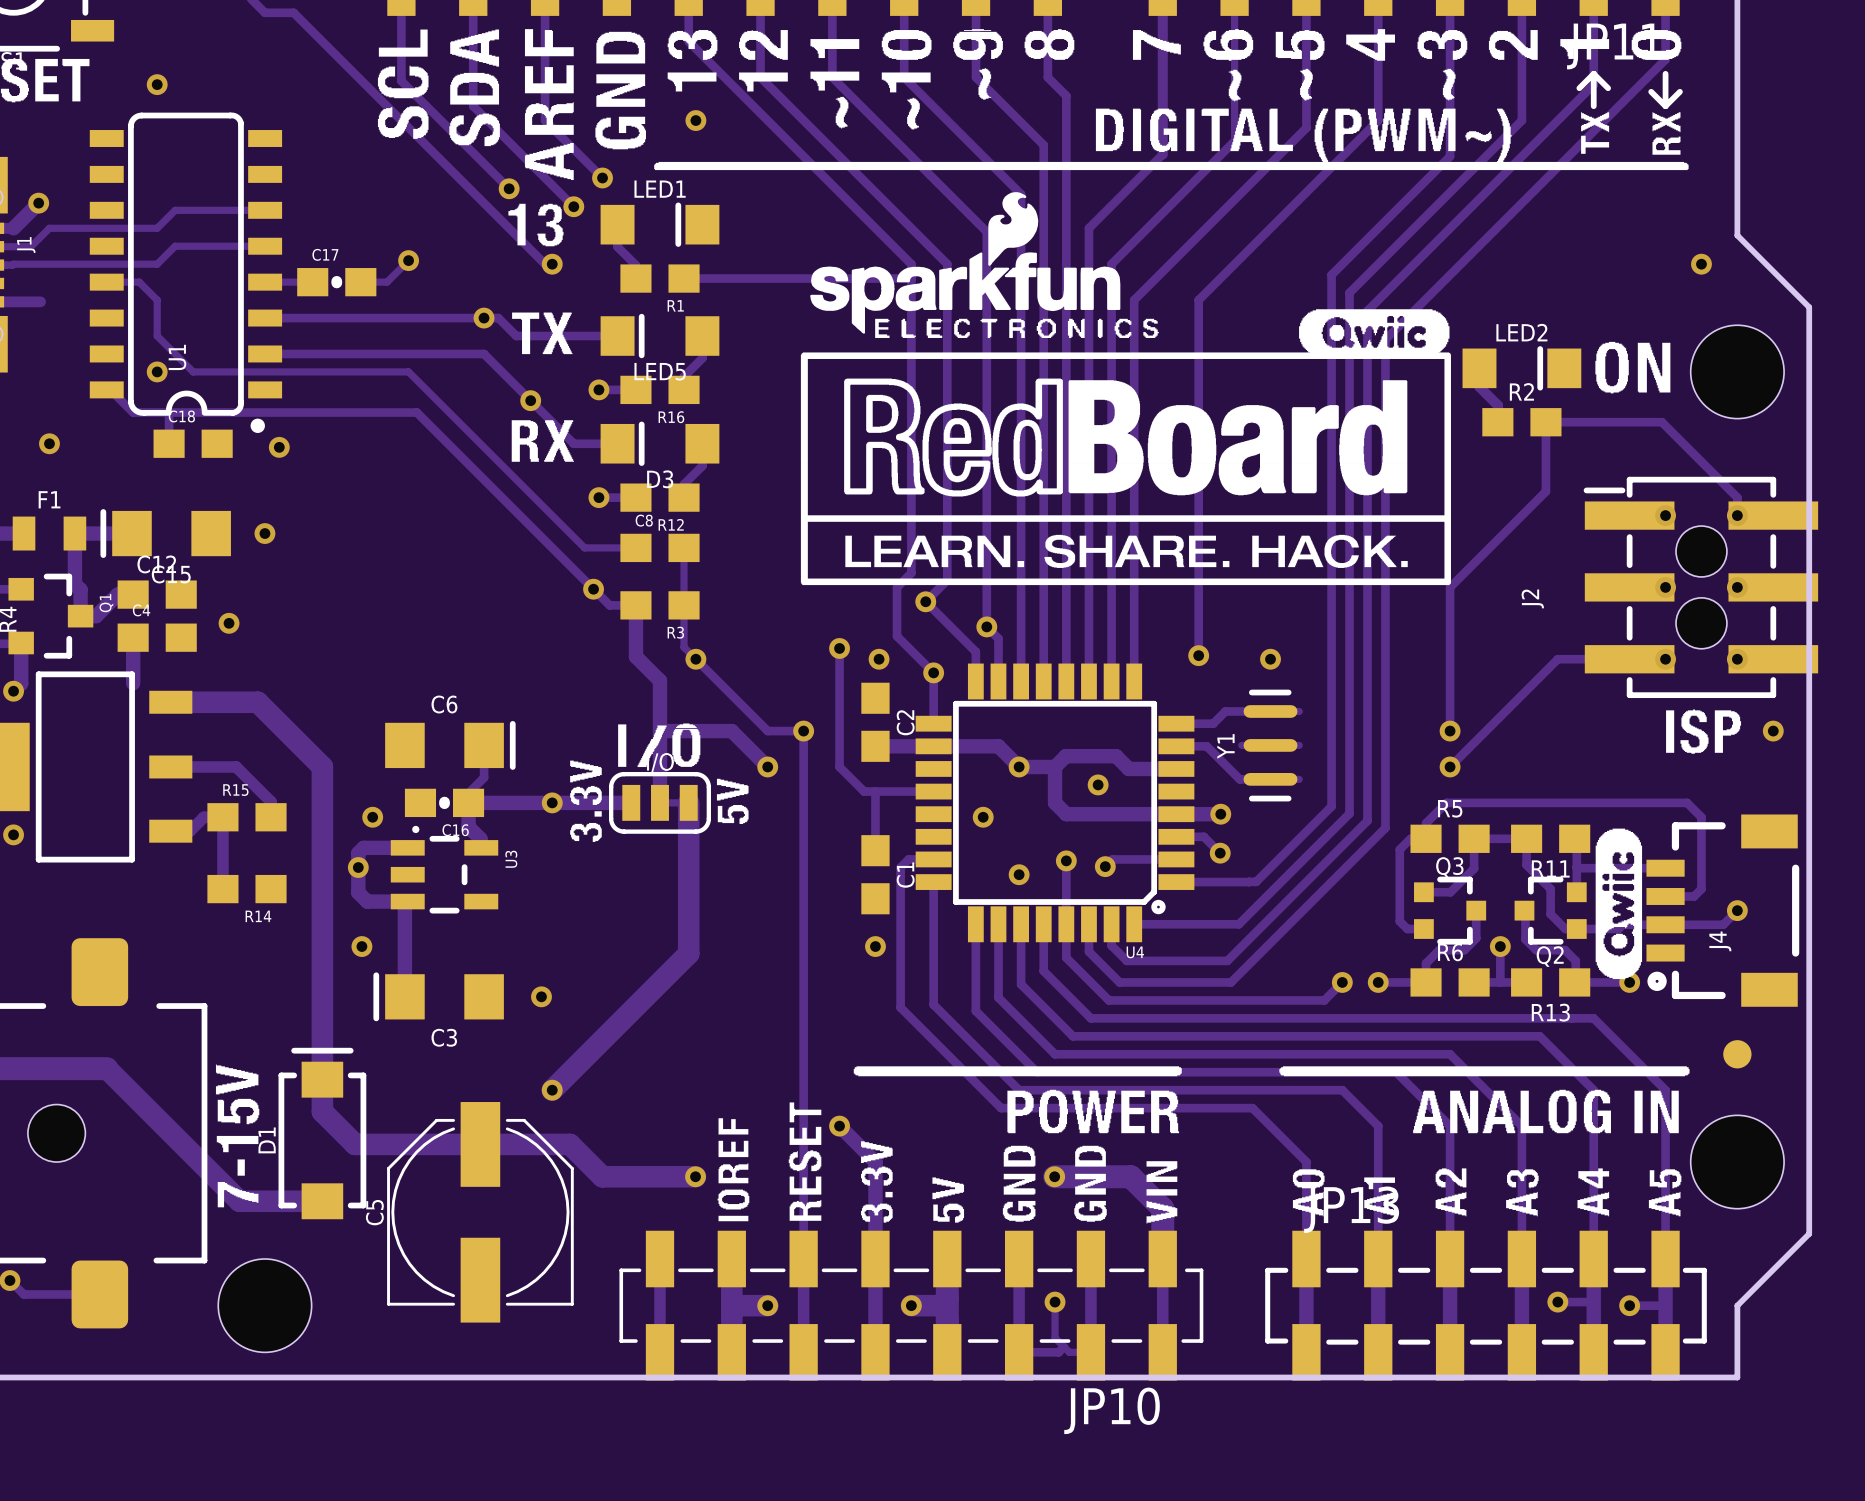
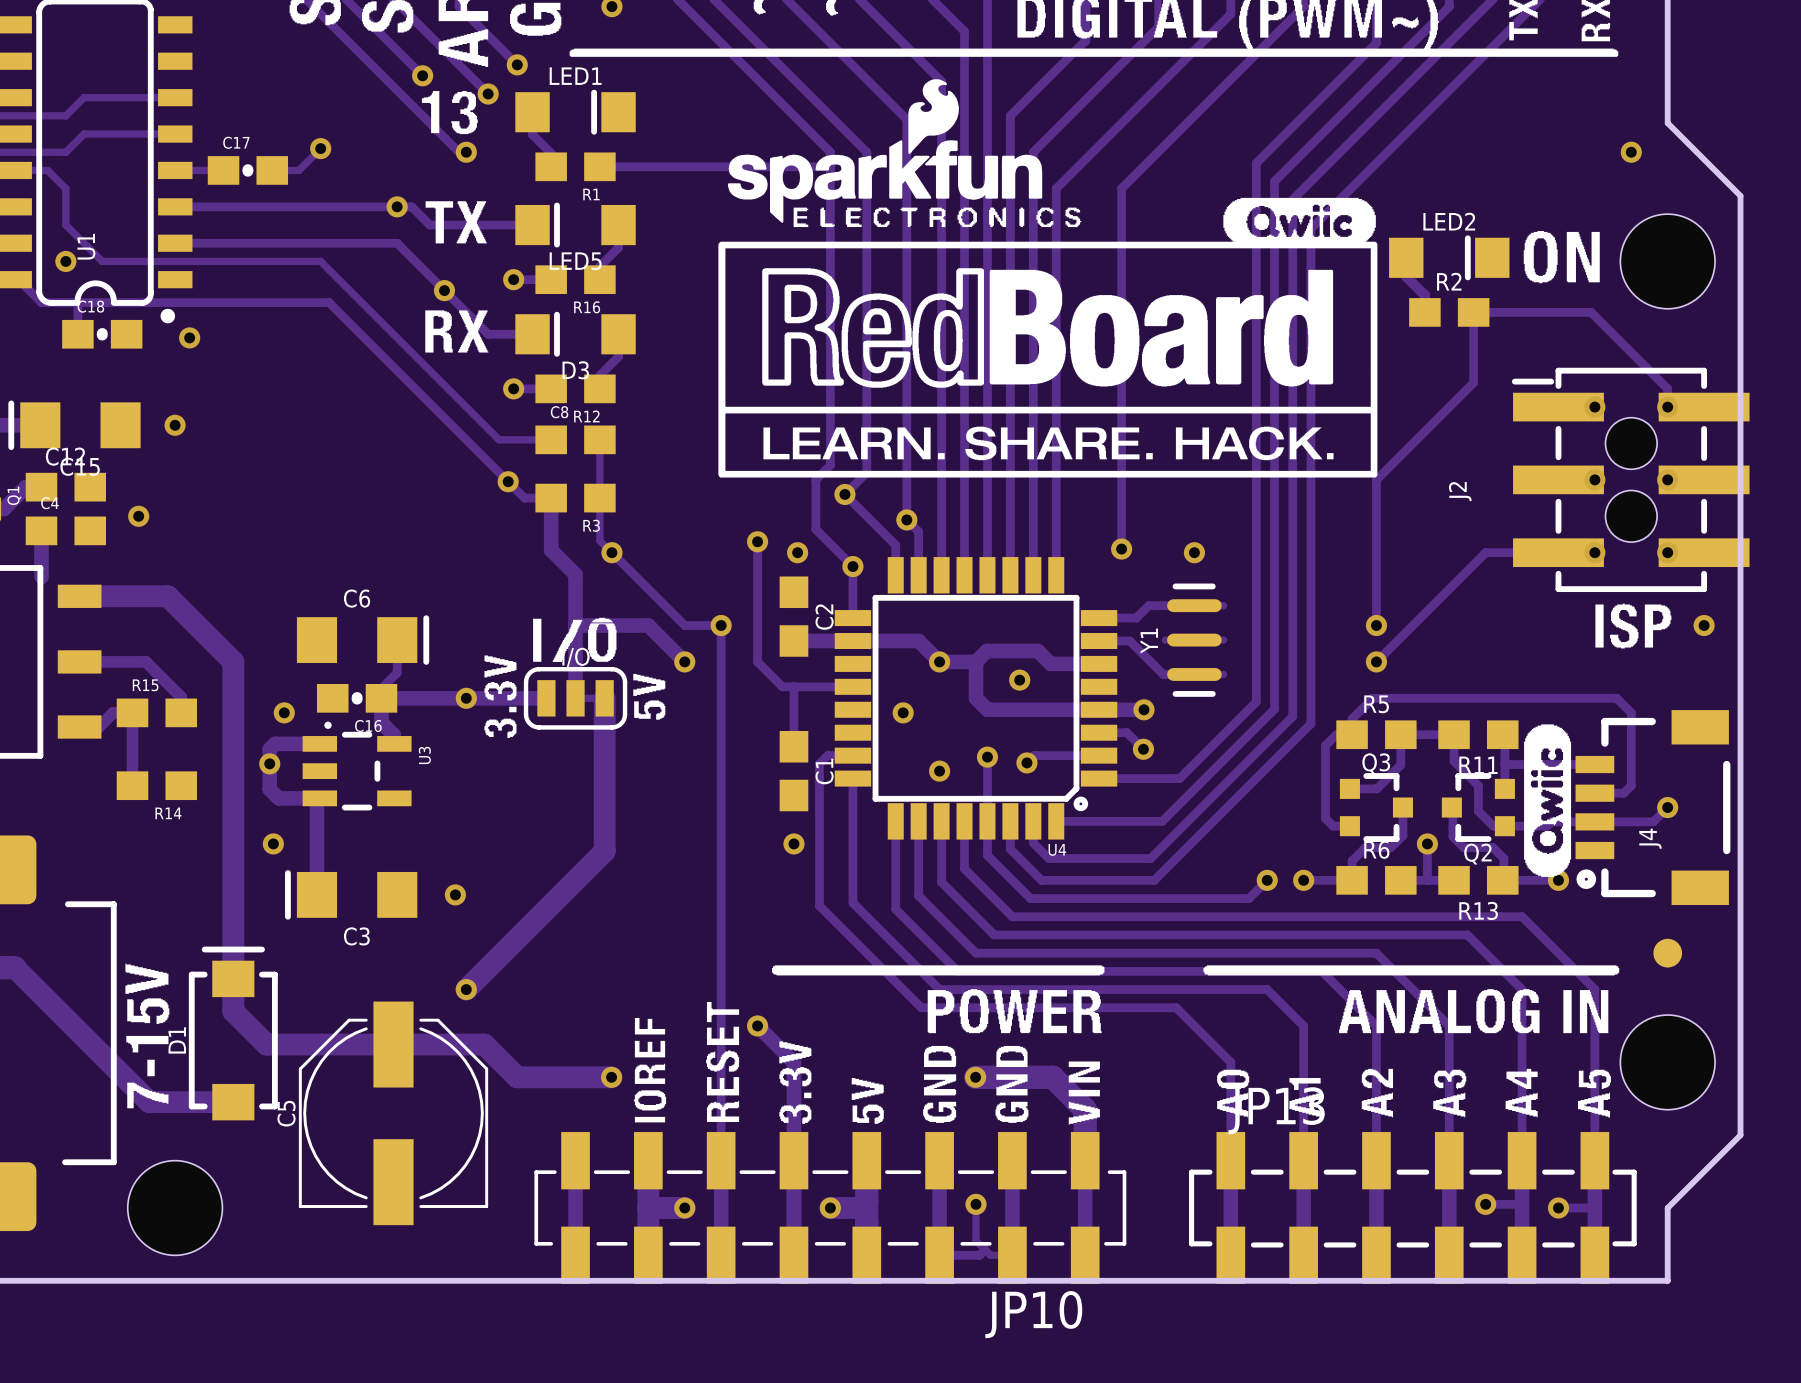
C18 footprint: [153, 429, 233, 458] -> [62, 319, 143, 349]
JP10 footprint: [619, 1230, 1204, 1381] -> [534, 1132, 1127, 1284]

